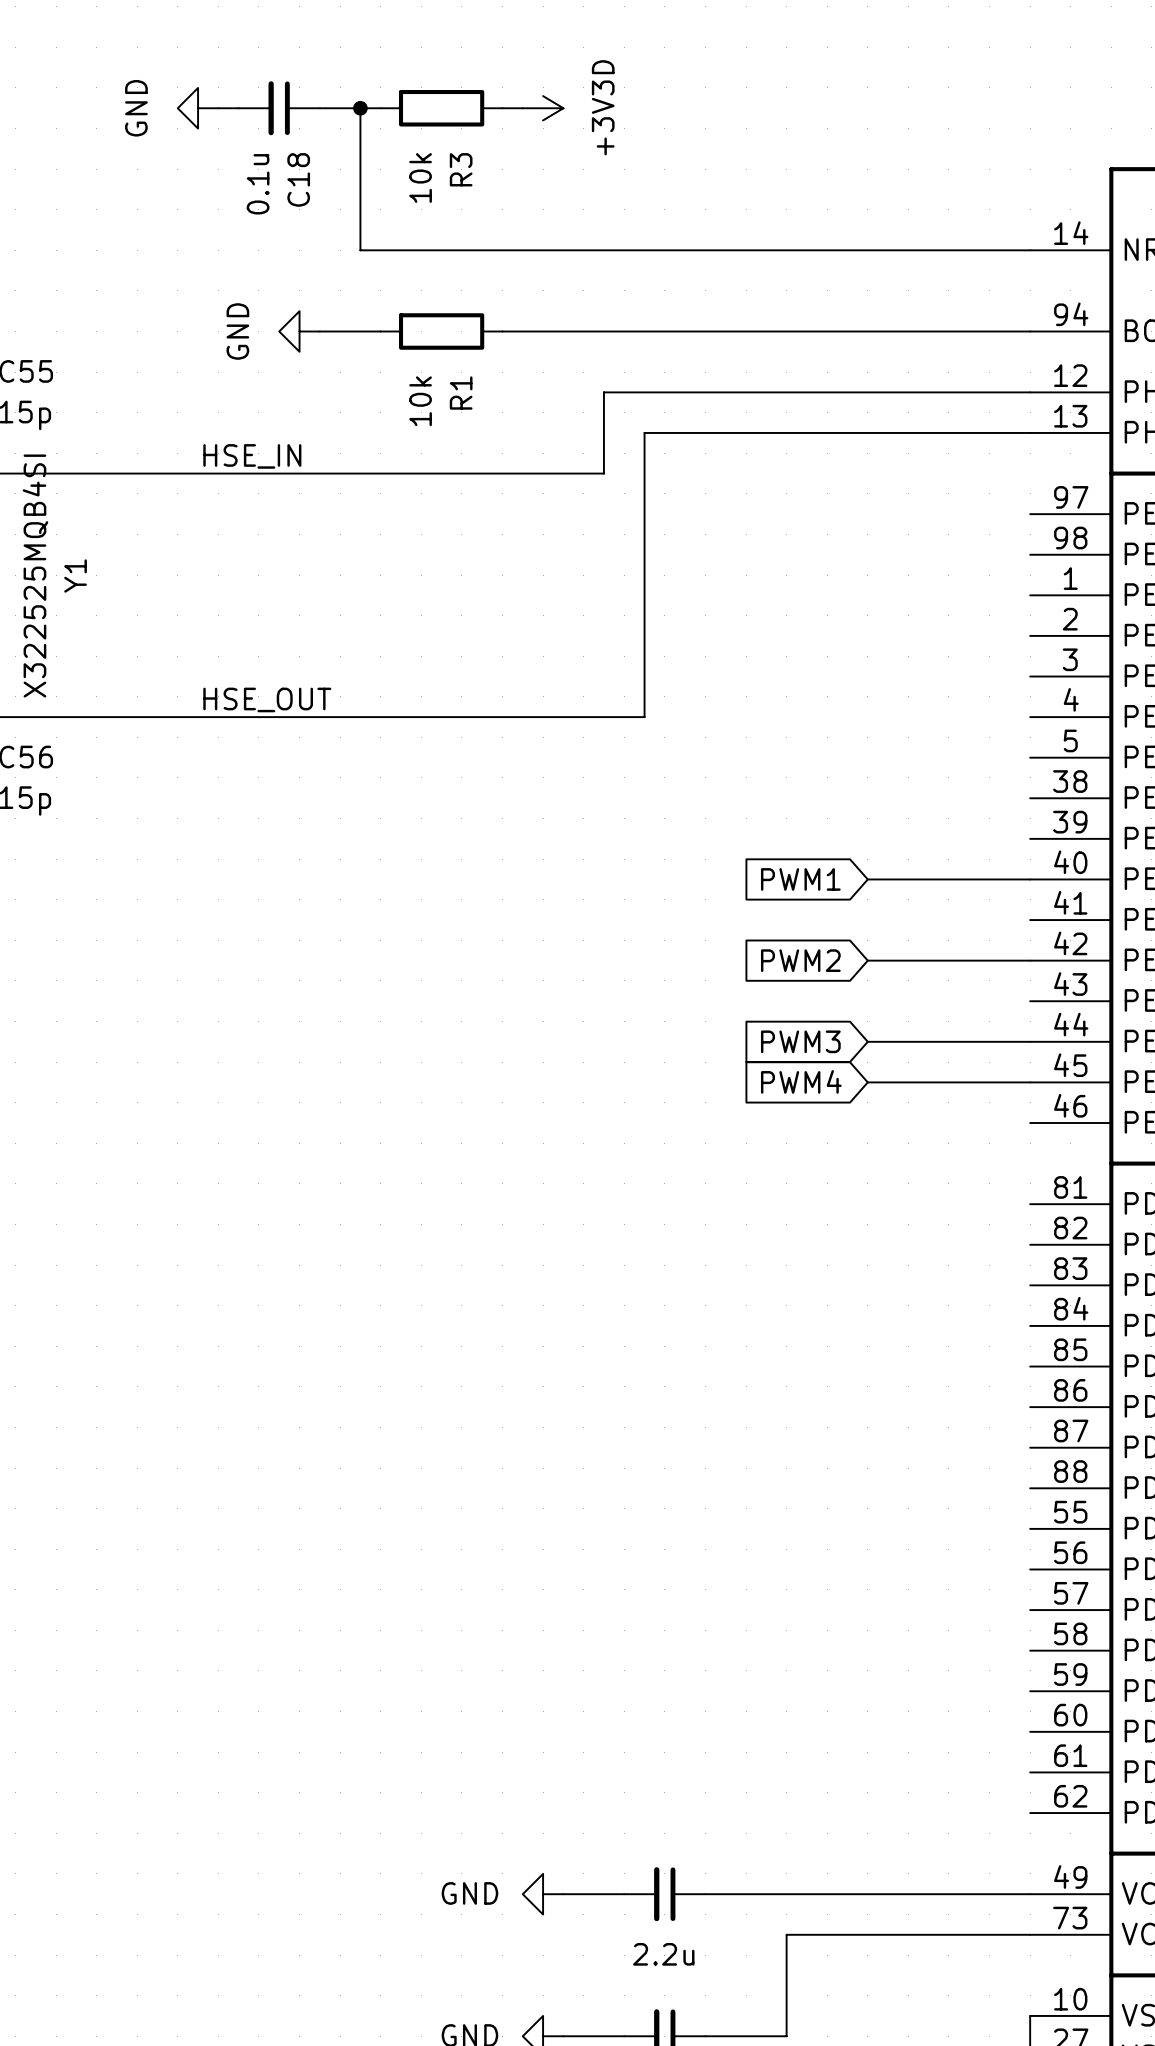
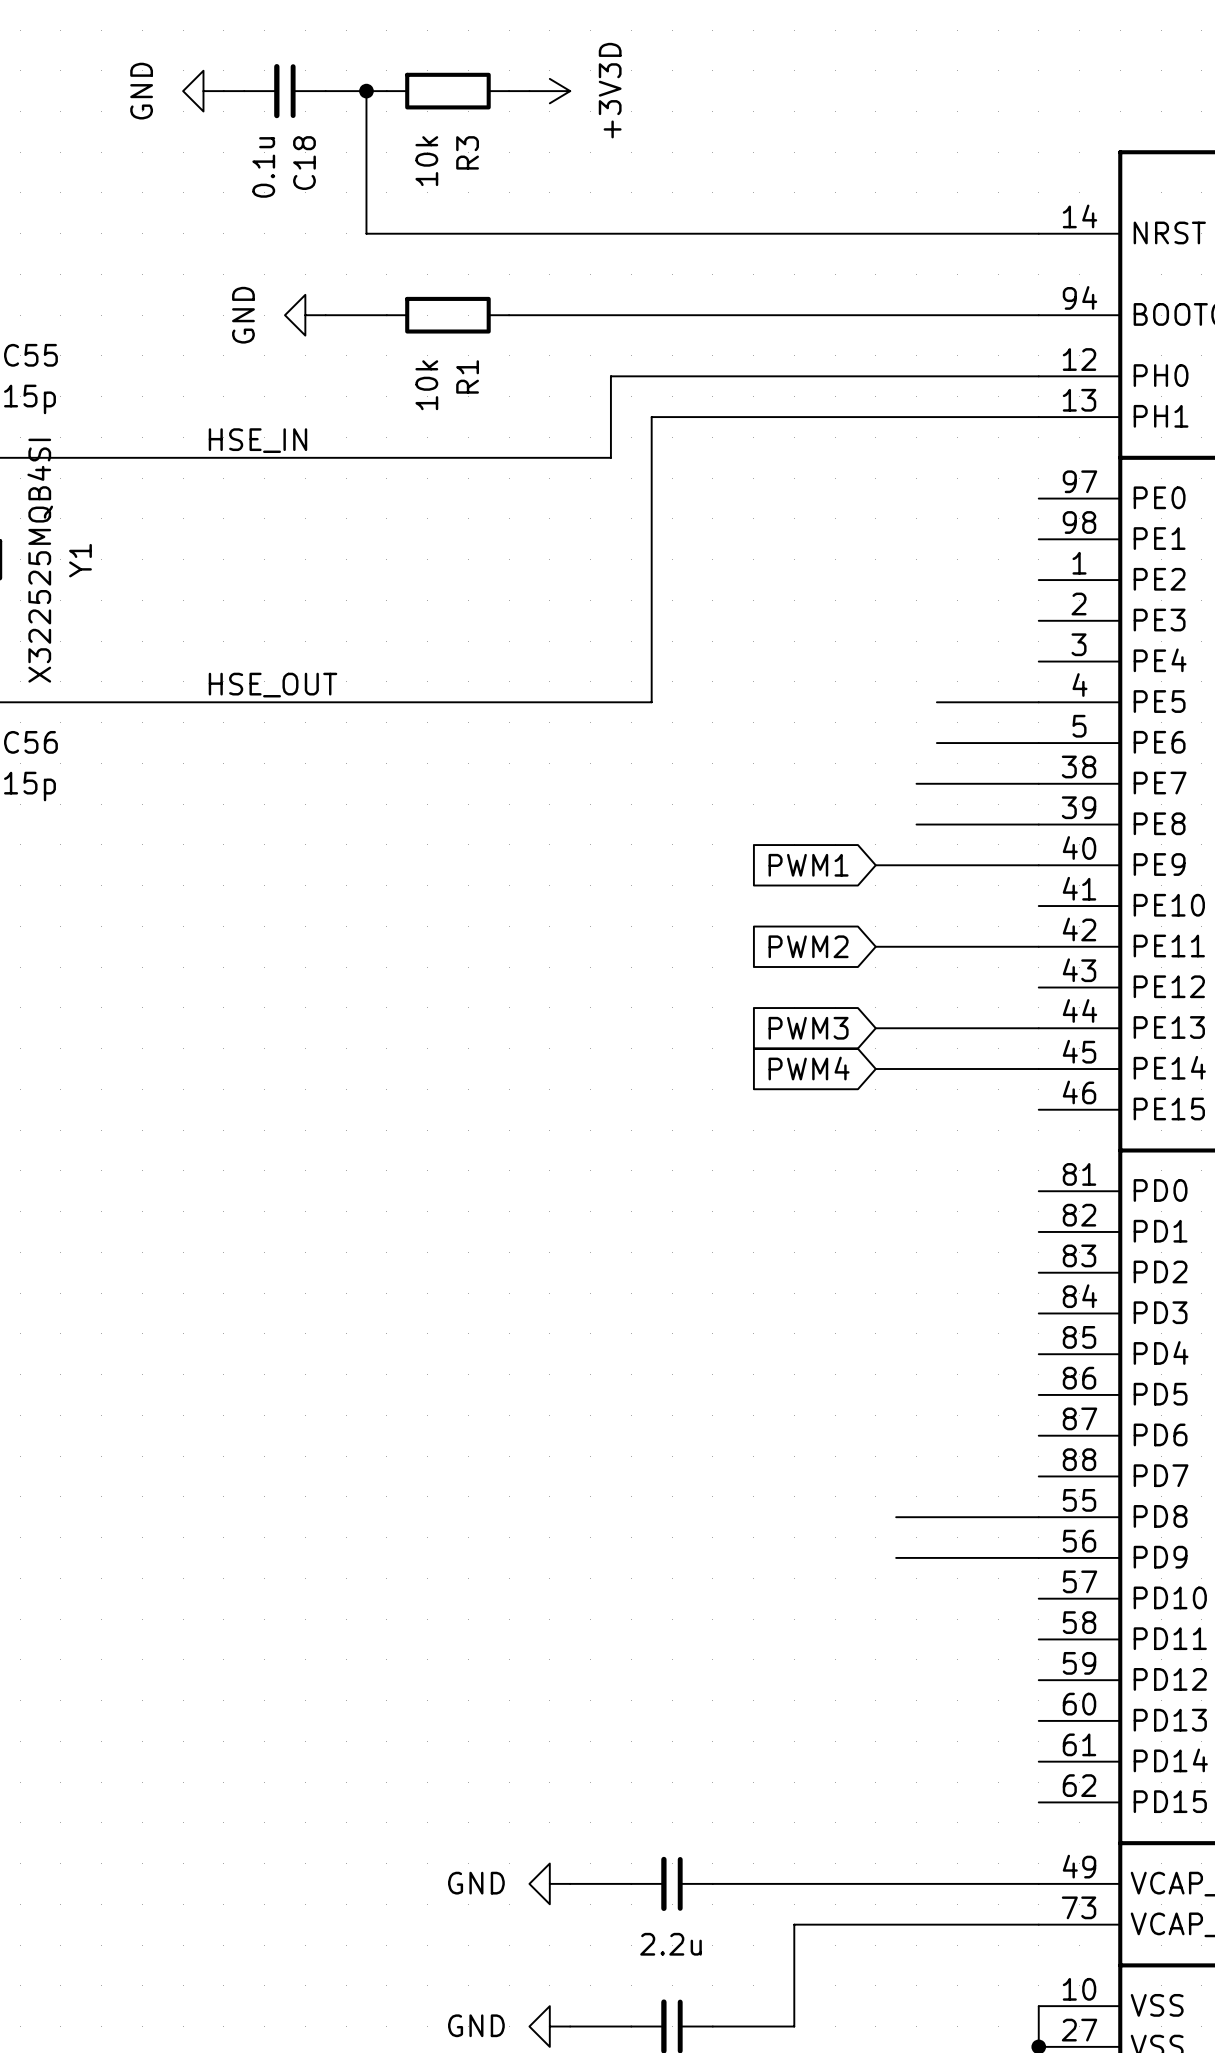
wire: none -> (936, 702) (1038, 702)
wire: none -> (936, 743) (1038, 743)
wire: none -> (916, 783) (1038, 783)
wire: none -> (916, 824) (1038, 824)
wire: none -> (896, 1517) (1038, 1517)
wire: none -> (896, 1557) (1038, 1557)

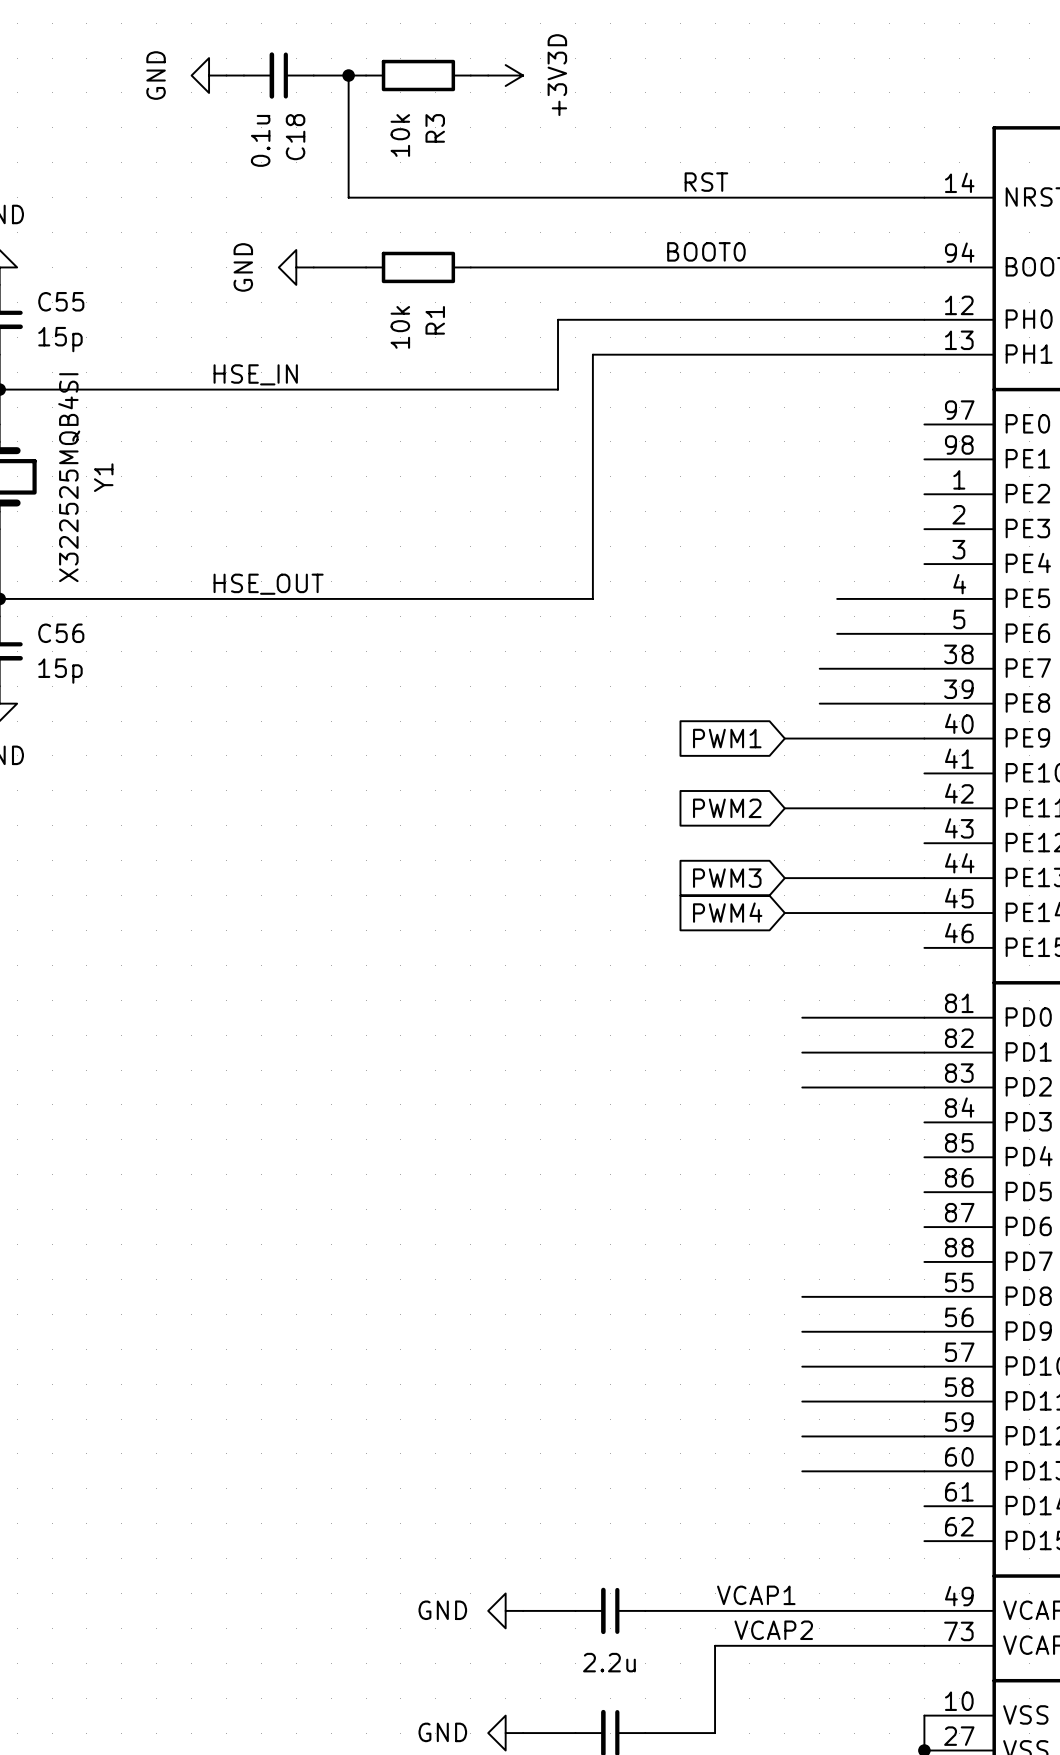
label: none -> RST (706, 182)
label: none -> BOOT0 (706, 251)
wire: none -> (802, 1017) (924, 1017)
wire: none -> (802, 1052) (924, 1052)
wire: none -> (802, 1087) (924, 1087)
wire: none -> (802, 1366) (924, 1366)
wire: none -> (802, 1401) (924, 1401)
wire: none -> (802, 1436) (924, 1436)
wire: none -> (802, 1471) (924, 1471)
label: none -> VCAP1 (756, 1595)
label: none -> VCAP2 (773, 1630)

